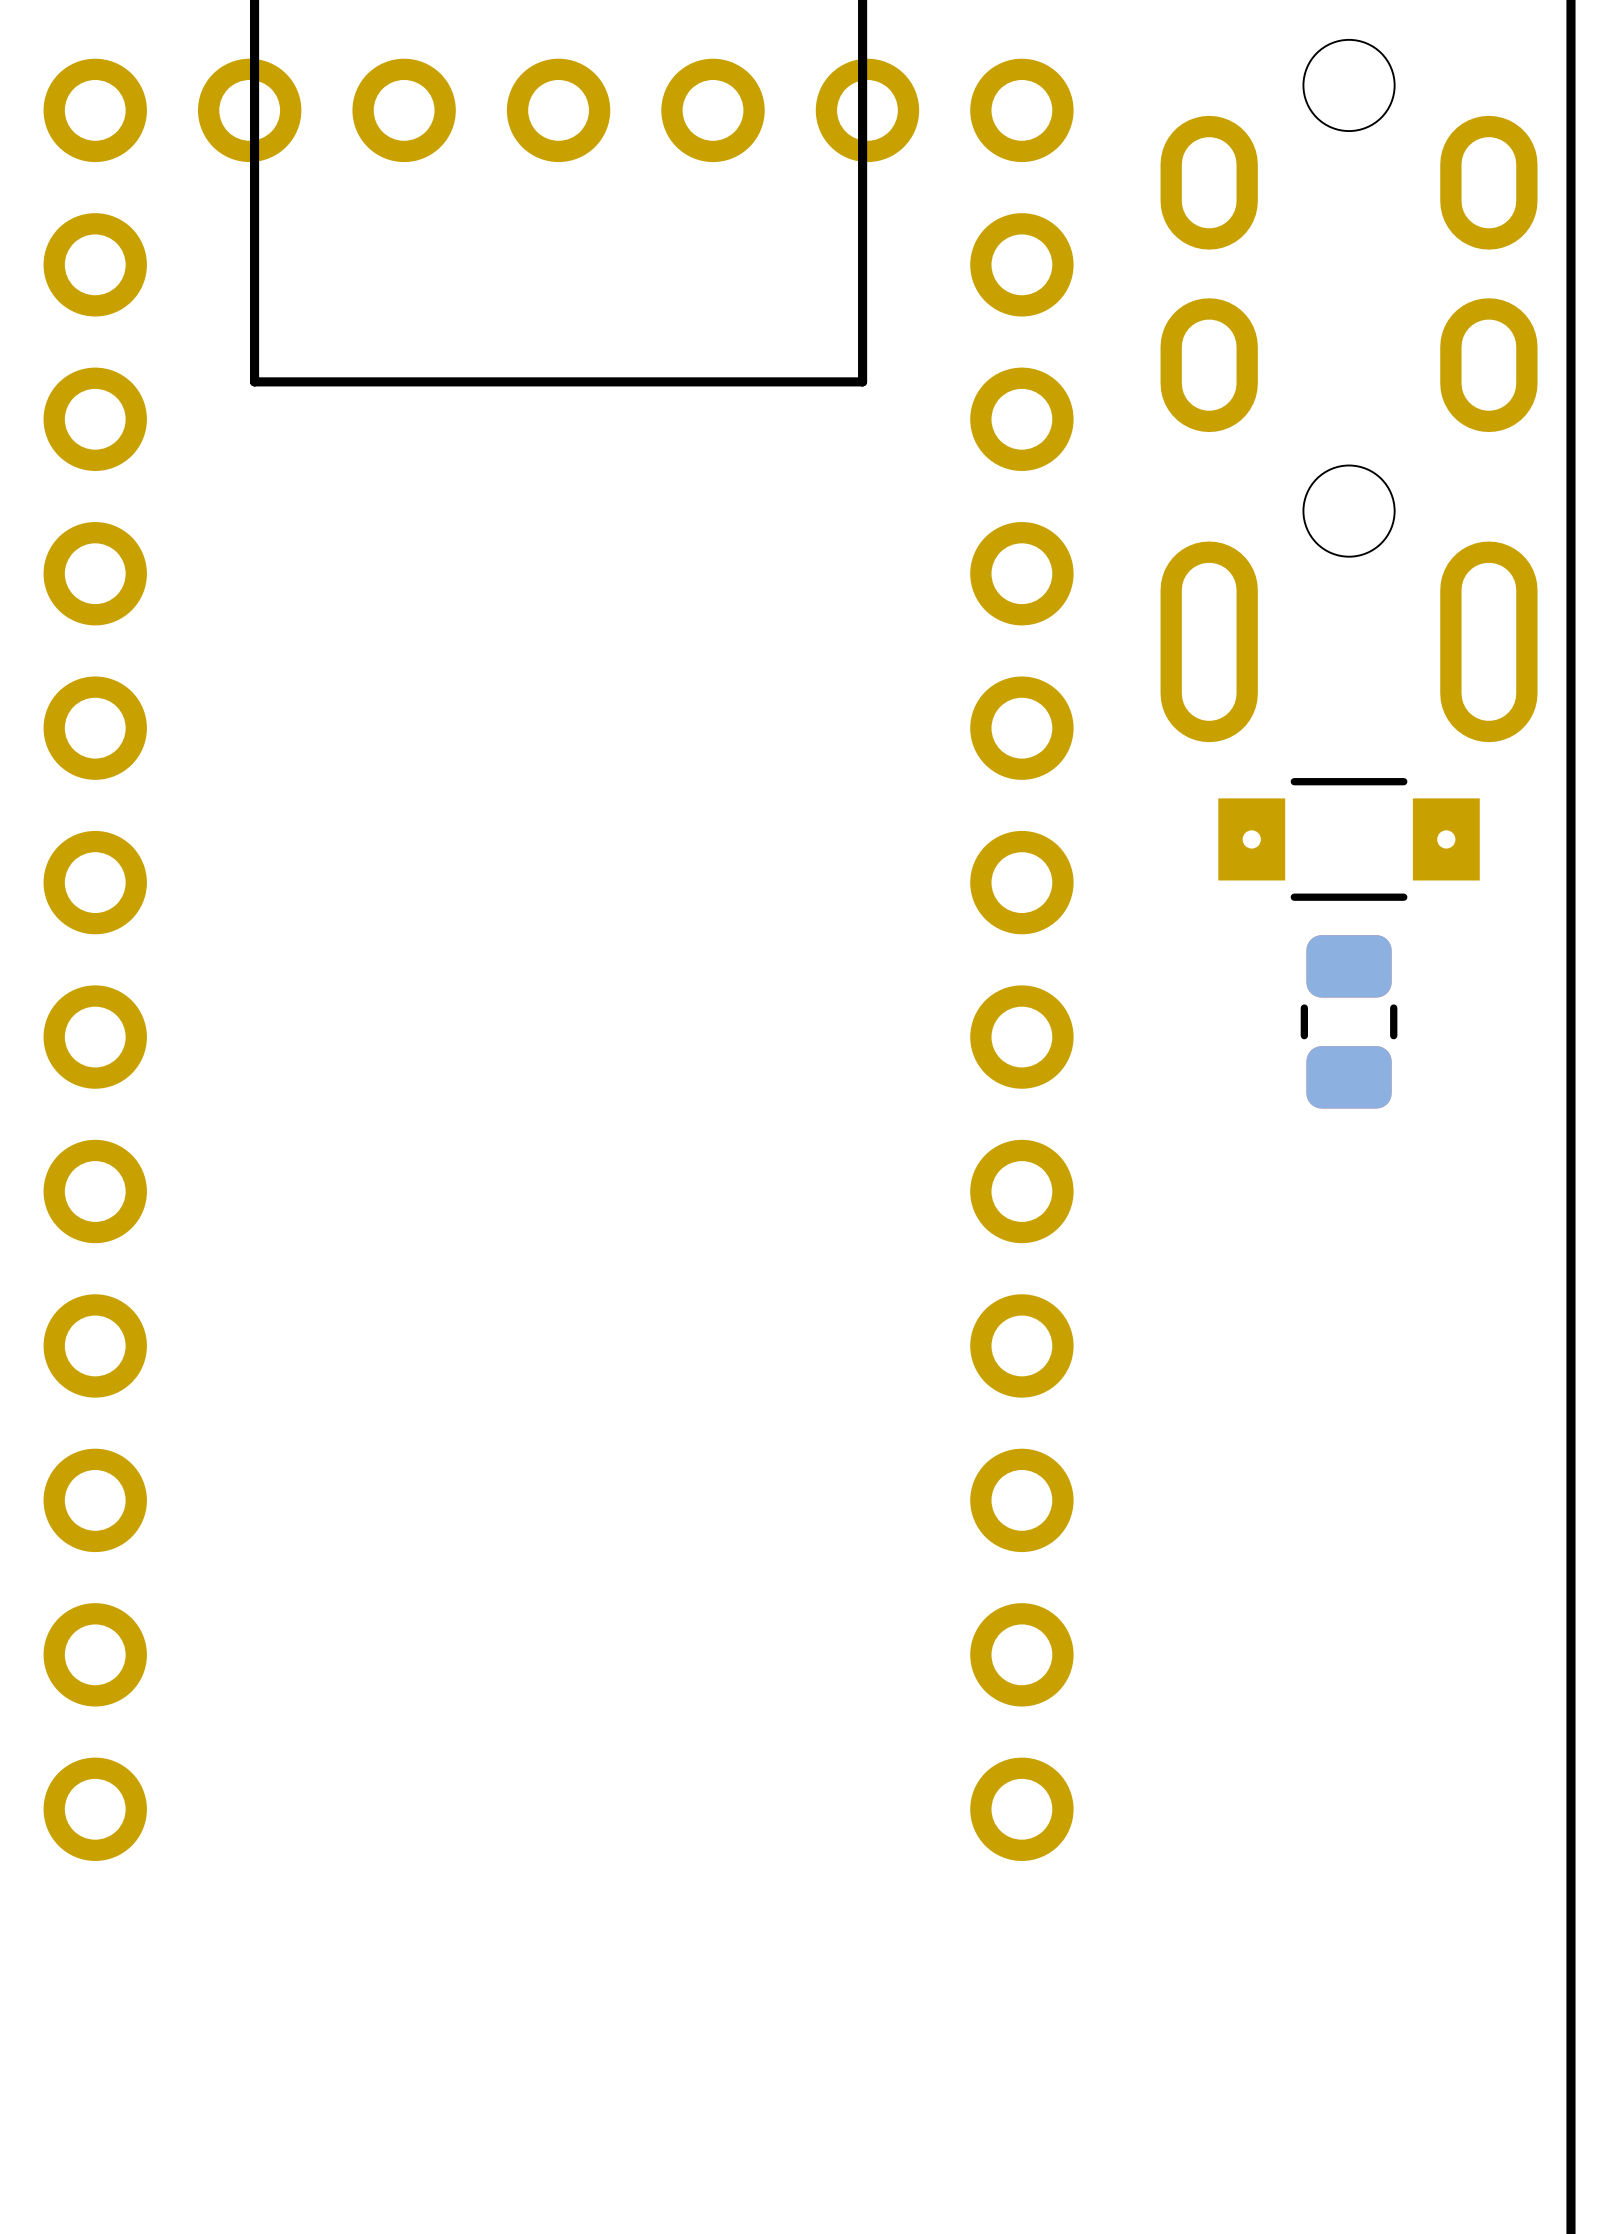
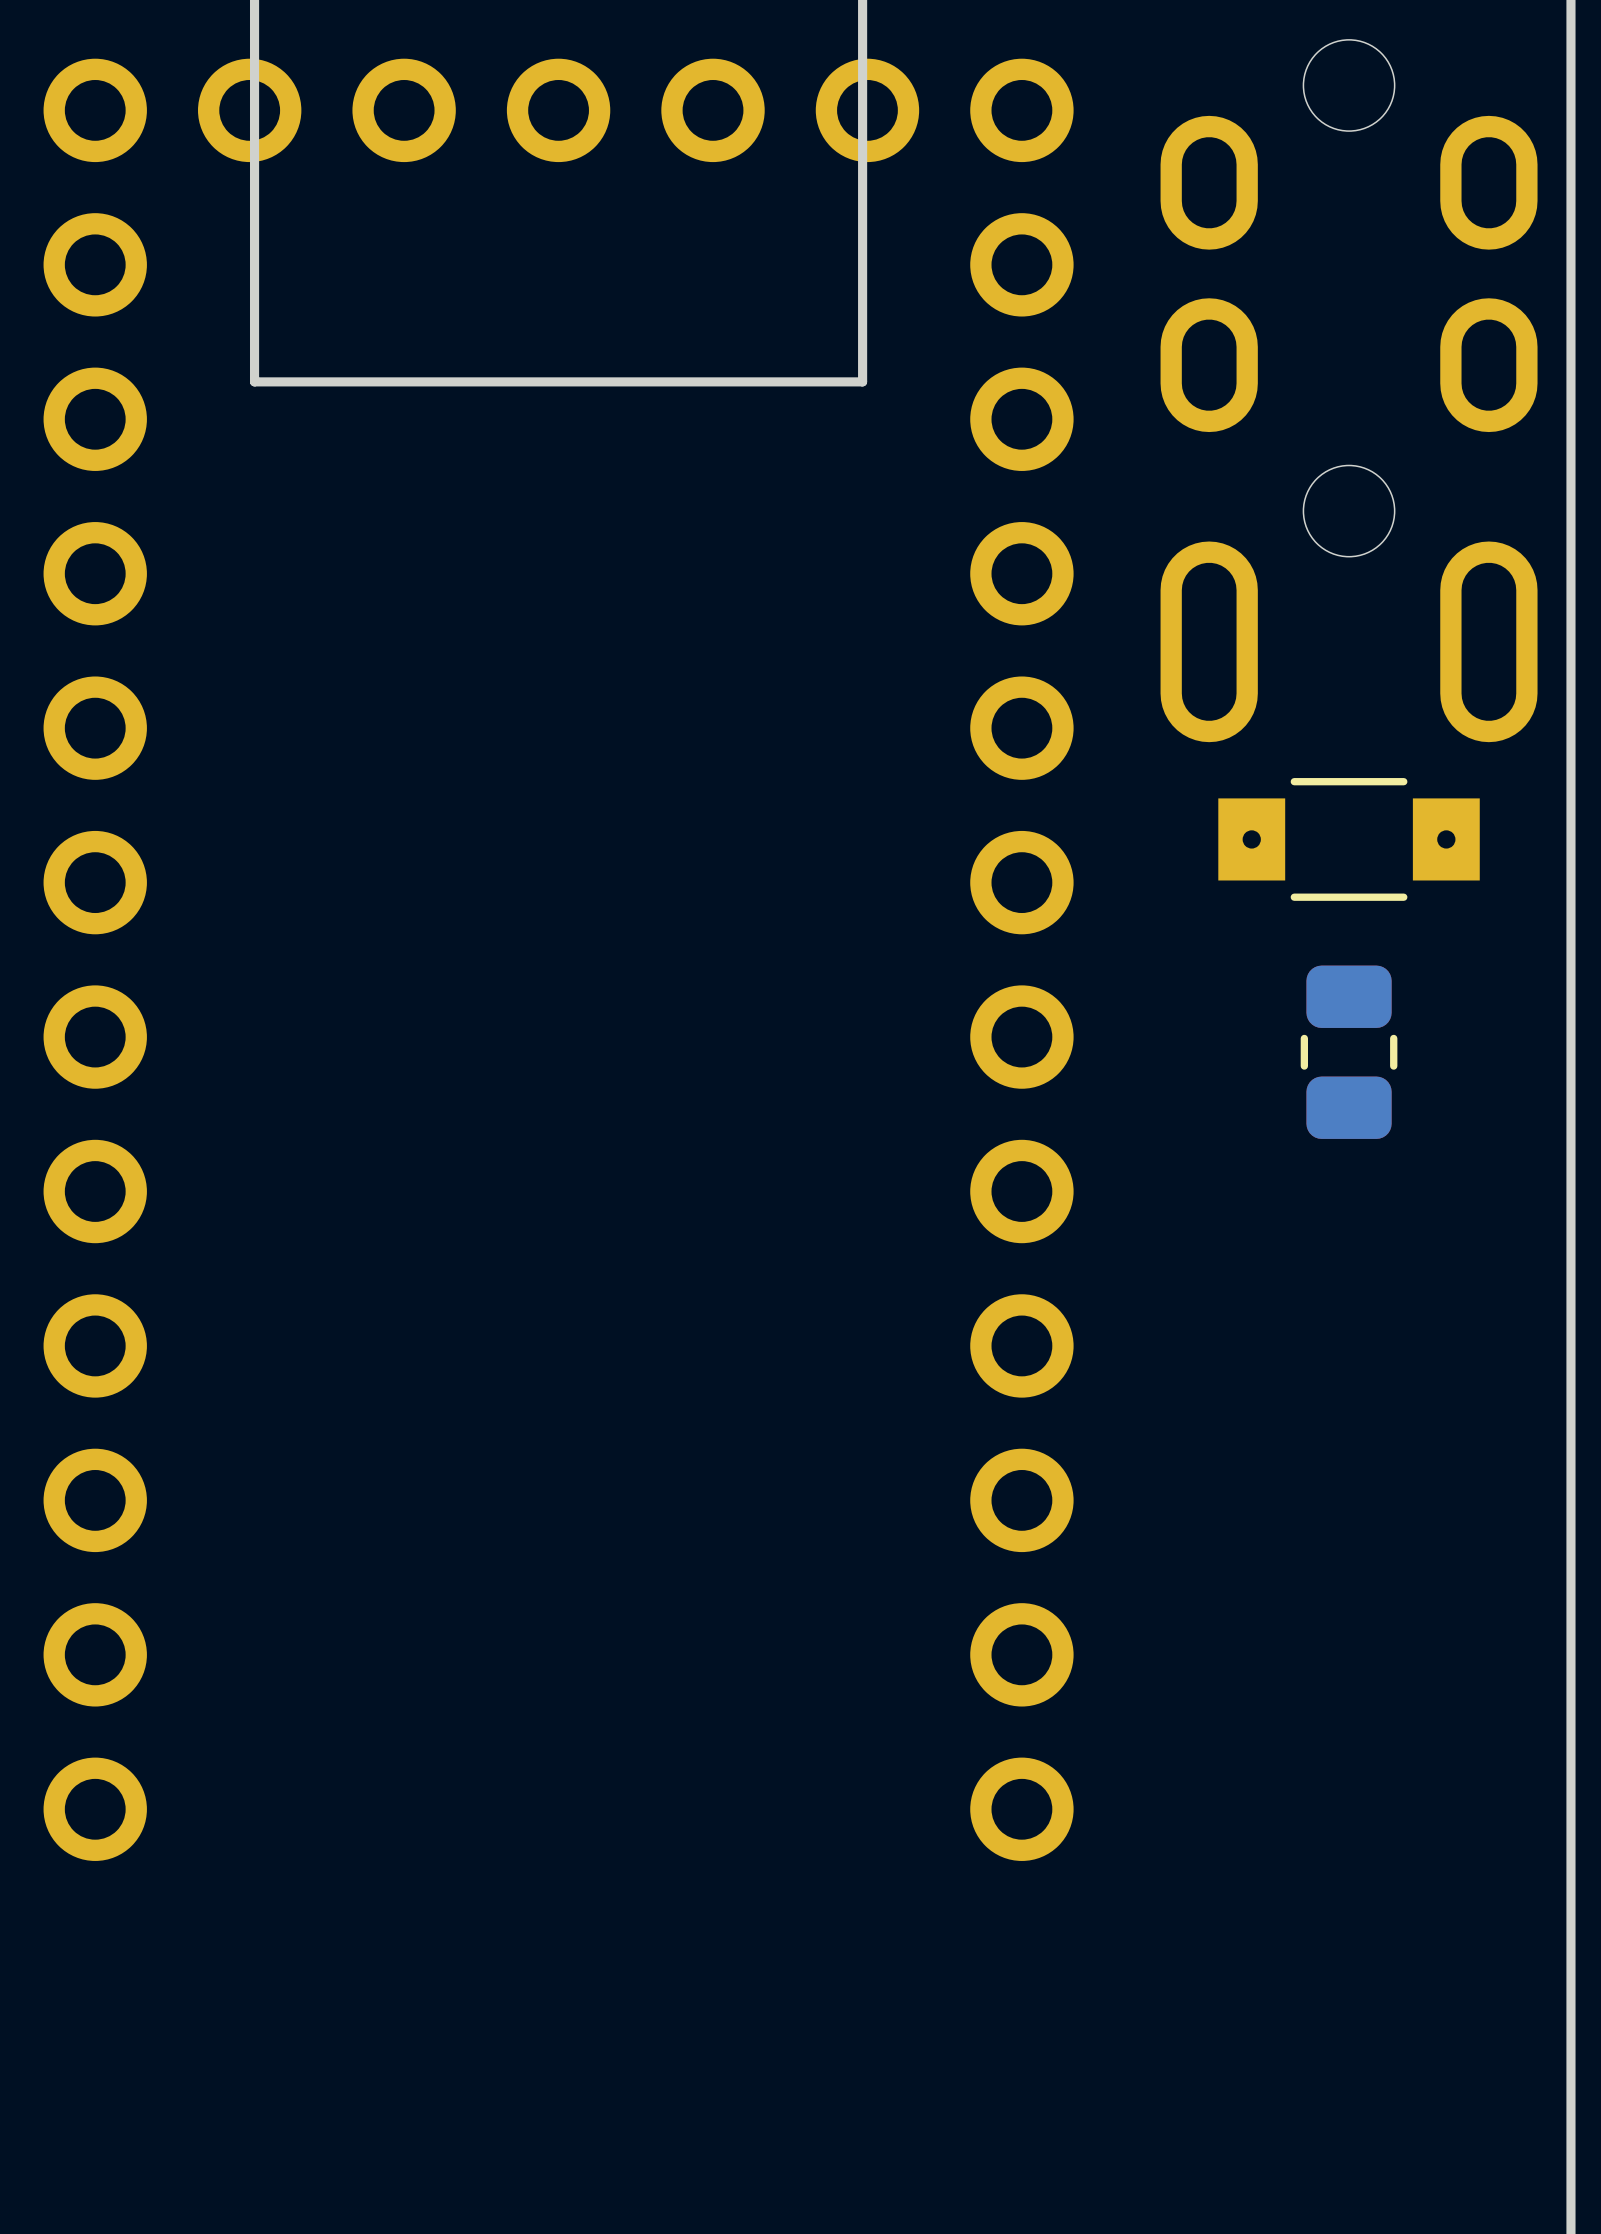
part position: (1349, 1021) -> (1349, 1052)

